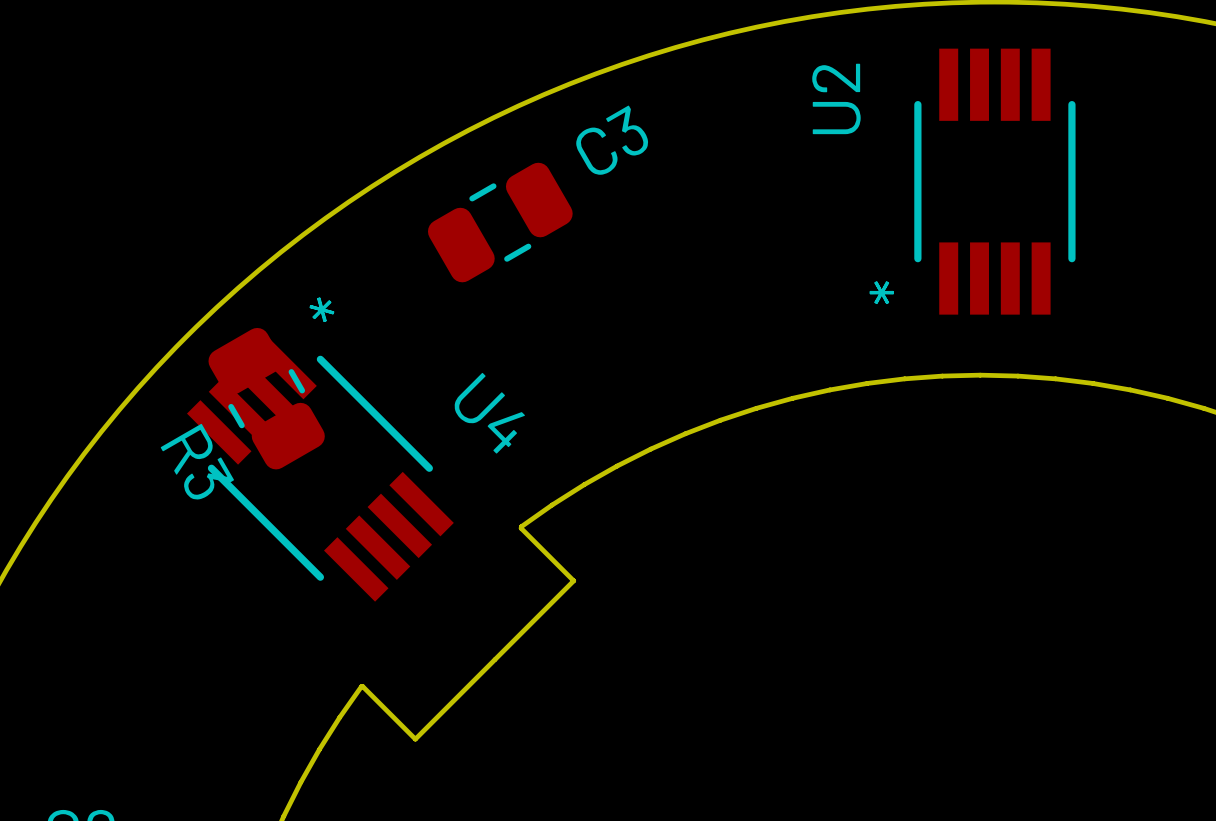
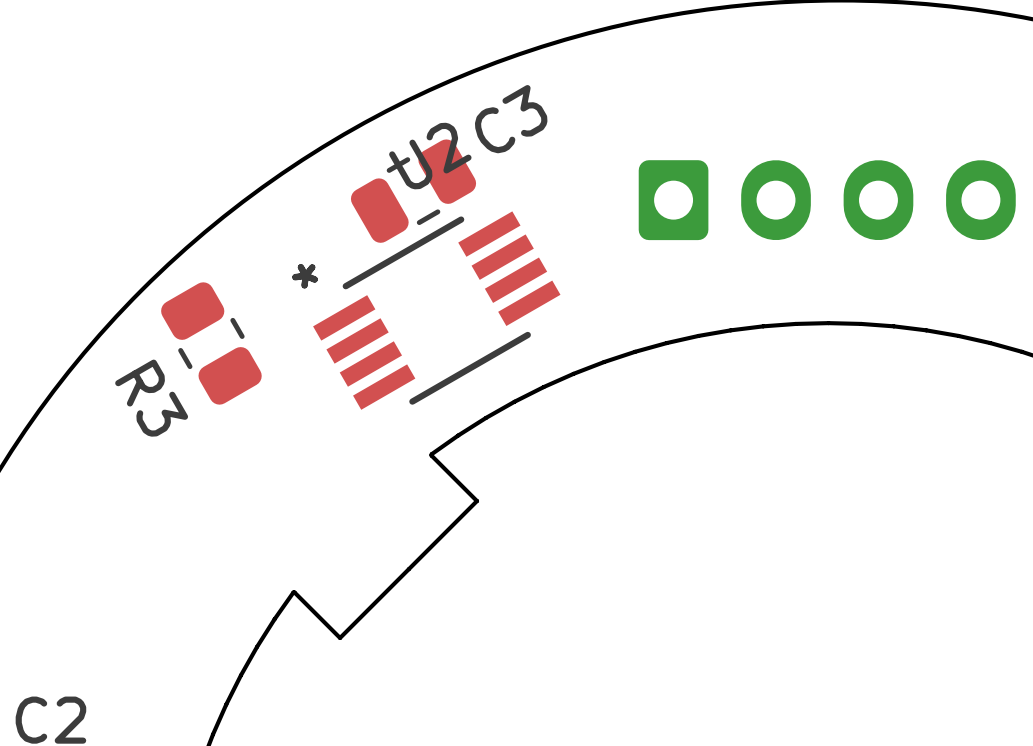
U2 rotation: 0° (994, 181) -> 60° clockwise (436, 310)
U2 position: (994, 181) -> (436, 310)
part: none -> (827, 200)
U4: (320, 468) -> none

